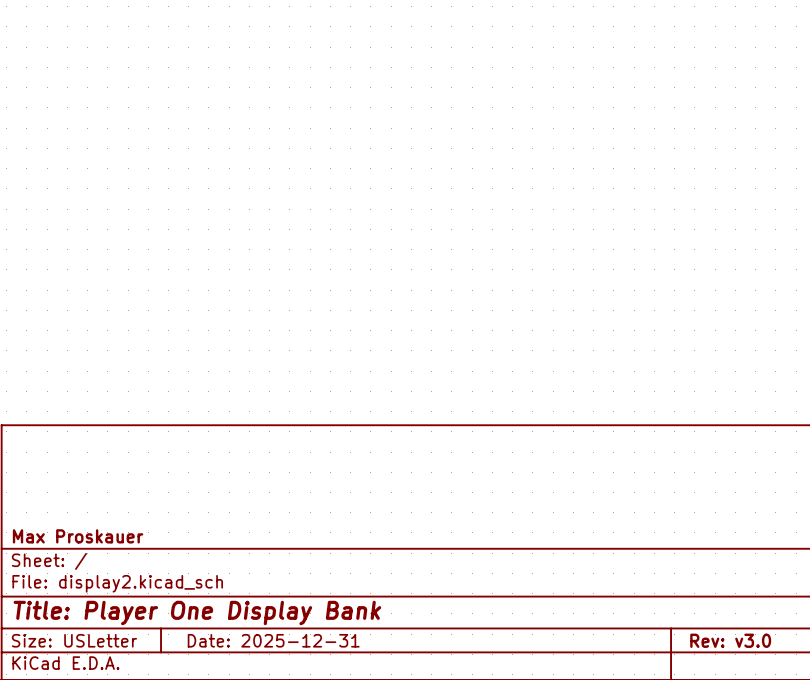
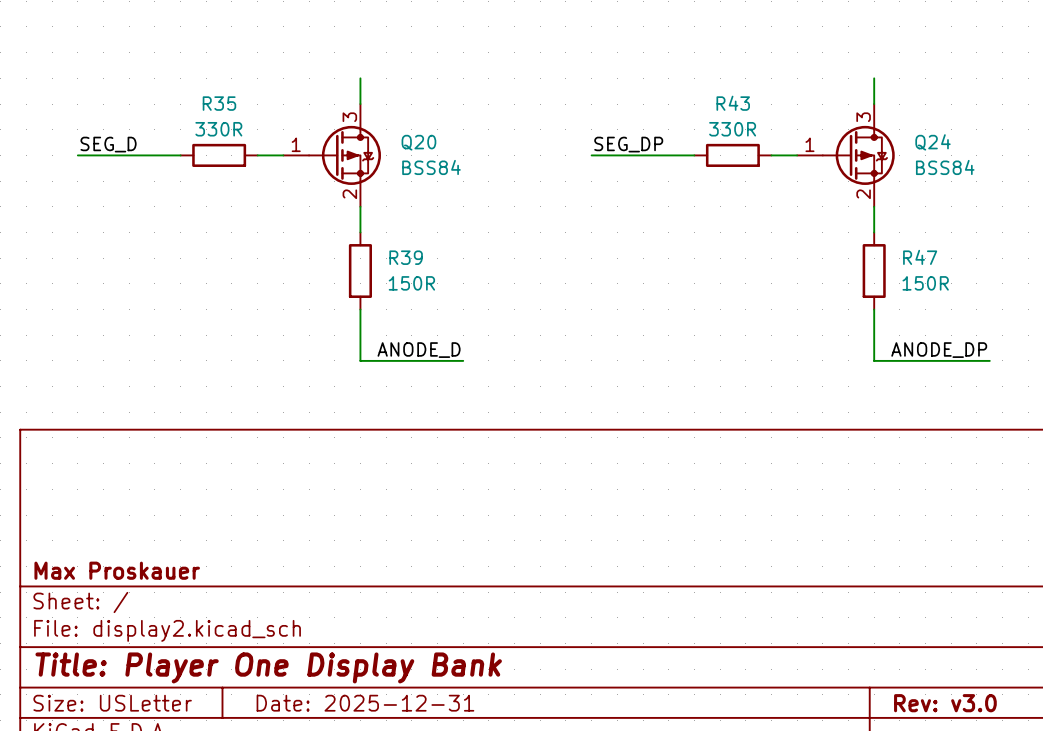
wire: none -> (360, 78) (360, 104)
wire: none -> (874, 78) (874, 104)
label: none -> SEG_D (108, 144)
label: none -> SEG_DP (628, 144)
wire: none -> (77, 155) (180, 155)
R35: none -> 330R (219, 155)
wire: none -> (257, 155) (283, 155)
Q20: none -> BSS84 (332, 155)
wire: none -> (591, 155) (694, 155)
R43: none -> 330R (732, 155)
wire: none -> (771, 155) (797, 155)
Q24: none -> BSS84 (845, 155)
wire: none -> (360, 206) (360, 232)
wire: none -> (874, 206) (874, 232)
R39: none -> 150R (360, 271)
R47: none -> 150R (874, 271)
wire: none -> (360, 309) (360, 360) (463, 360)
wire: none -> (874, 309) (874, 360) (989, 360)
label: none -> ANODE_D (419, 350)
label: none -> ANODE_DP (939, 350)

